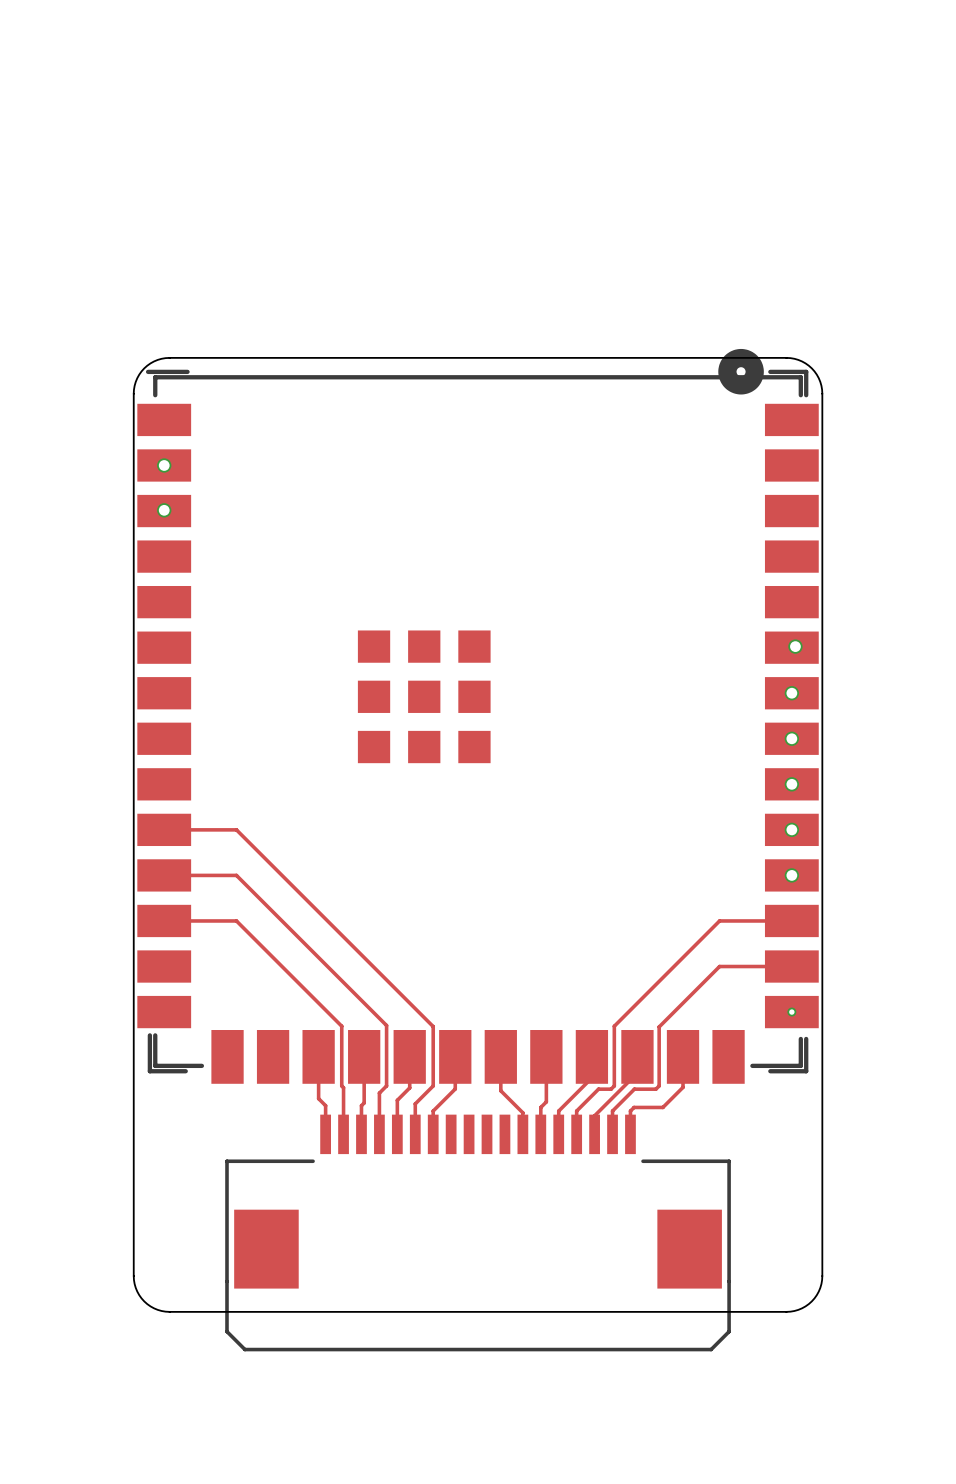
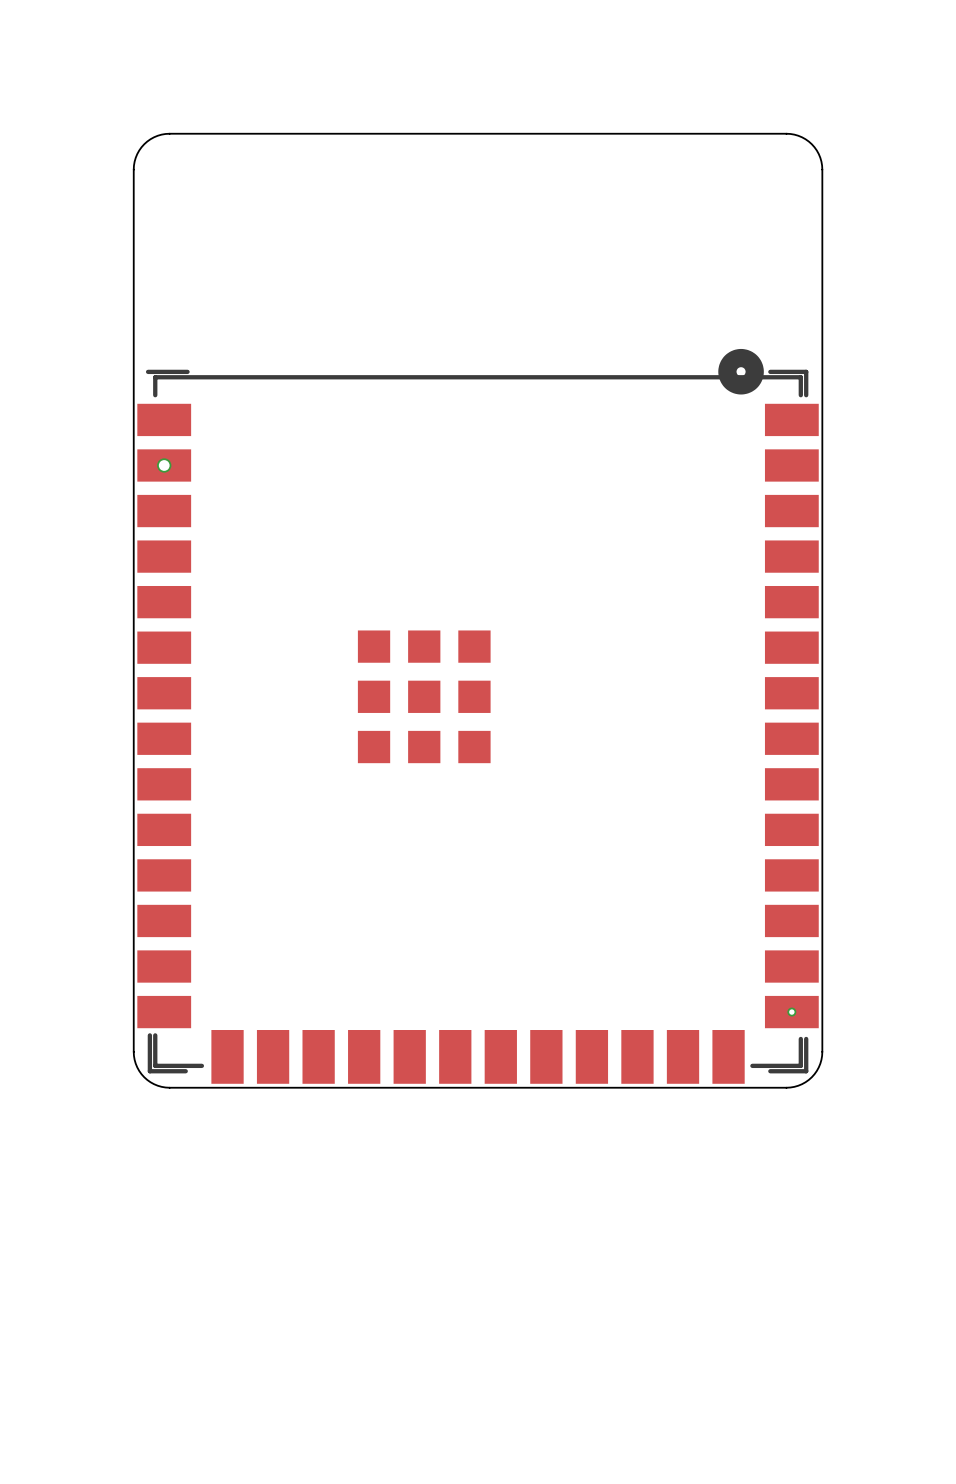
board edge: (133, 393) (137, 378) (144, 368) (157, 359) (169, 357) (786, 357) (798, 359) (811, 368) (820, 381) (822, 393) -> (133, 393) (133, 165) (137, 154) (144, 144) (154, 137) (169, 133) (786, 133) (798, 135) (814, 147) (822, 165) (822, 393)
via: (164, 510) -> none
via: (795, 646) -> none
via: (791, 693) -> none
via: (791, 738) -> none
via: (791, 784) -> none
track: (164, 829) (236, 829) (433, 1026) (433, 1085) (415, 1103) (415, 1134) -> none
via: (791, 829) -> none
track: (164, 875) (236, 875) (386, 1025) (386, 1085) (379, 1093) (379, 1134) -> none
via: (791, 875) -> none
track: (164, 920) (236, 920) (341, 1026) (343, 1134) -> none
track: (791, 920) (719, 920) (614, 1026) (614, 1085) (611, 1089) (598, 1089) (576, 1111) (576, 1134) -> none
track: (791, 966) (719, 966) (659, 1026) (659, 1085) (655, 1089) (634, 1089) (612, 1111) (612, 1134) -> none
board edge: (133, 1051) (133, 1280) (137, 1291) (147, 1304) (157, 1309) (169, 1311) (786, 1311) (798, 1309) (814, 1298) (822, 1280) (822, 1051) -> (133, 1051) (137, 1067) (144, 1077) (154, 1084) (169, 1087) (786, 1087) (802, 1084) (811, 1077) (818, 1067) (822, 1051)
track: (318, 1056) (318, 1098) (325, 1105) (325, 1134) -> none
track: (364, 1056) (364, 1102) (361, 1105) (361, 1134) -> none
track: (409, 1056) (409, 1087) (397, 1100) (397, 1134) -> none
track: (455, 1056) (455, 1088) (433, 1111) (433, 1134) -> none
track: (500, 1056) (500, 1090) (522, 1112) (522, 1134) -> none
track: (546, 1056) (546, 1101) (540, 1107) (540, 1134) -> none
track: (591, 1056) (591, 1077) (558, 1111) (558, 1134) -> none
track: (637, 1056) (637, 1072) (594, 1115) (594, 1134) -> none
track: (683, 1056) (683, 1087) (662, 1107) (634, 1107) (630, 1111) (630, 1134) -> none
part: (478, 1232) -> none

